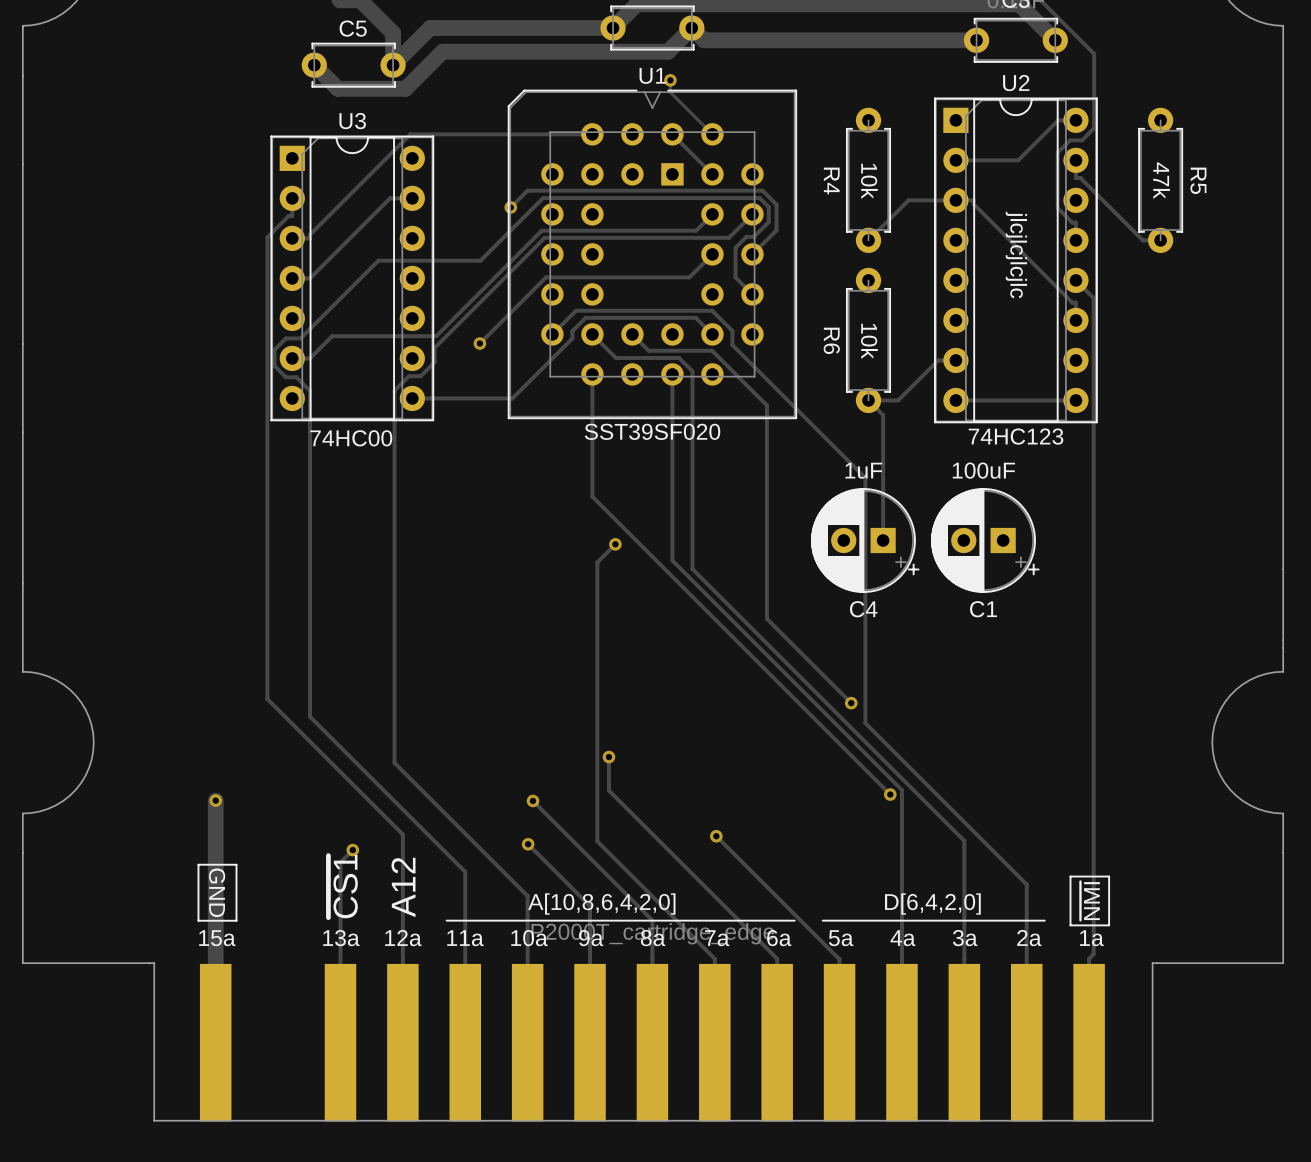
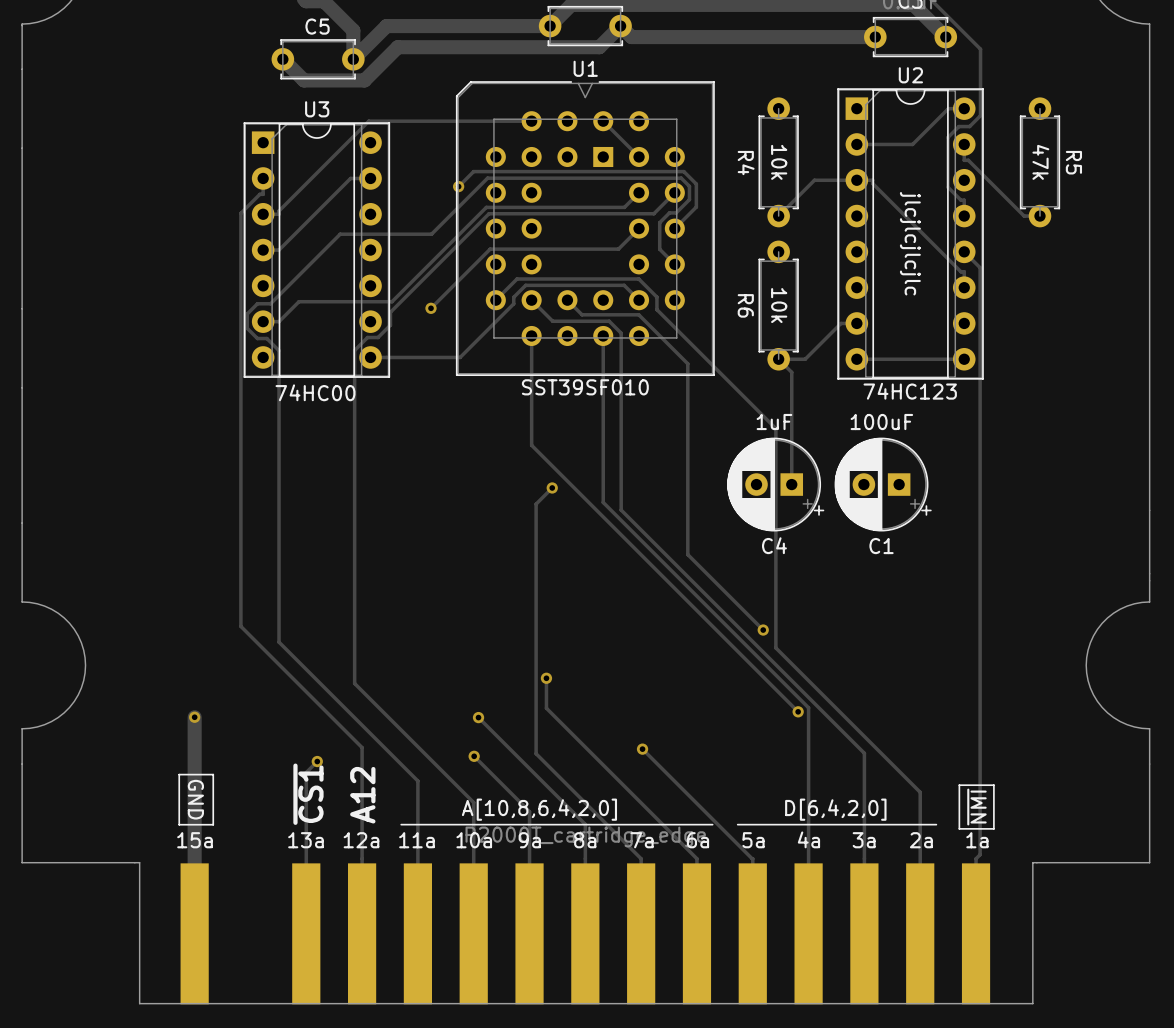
track: (670, 80) (670, 92) (712, 134) -> none
via: (670, 80) -> none
U1 value: SST39SF020 (652, 431) -> SST39SF010 (585, 387)

